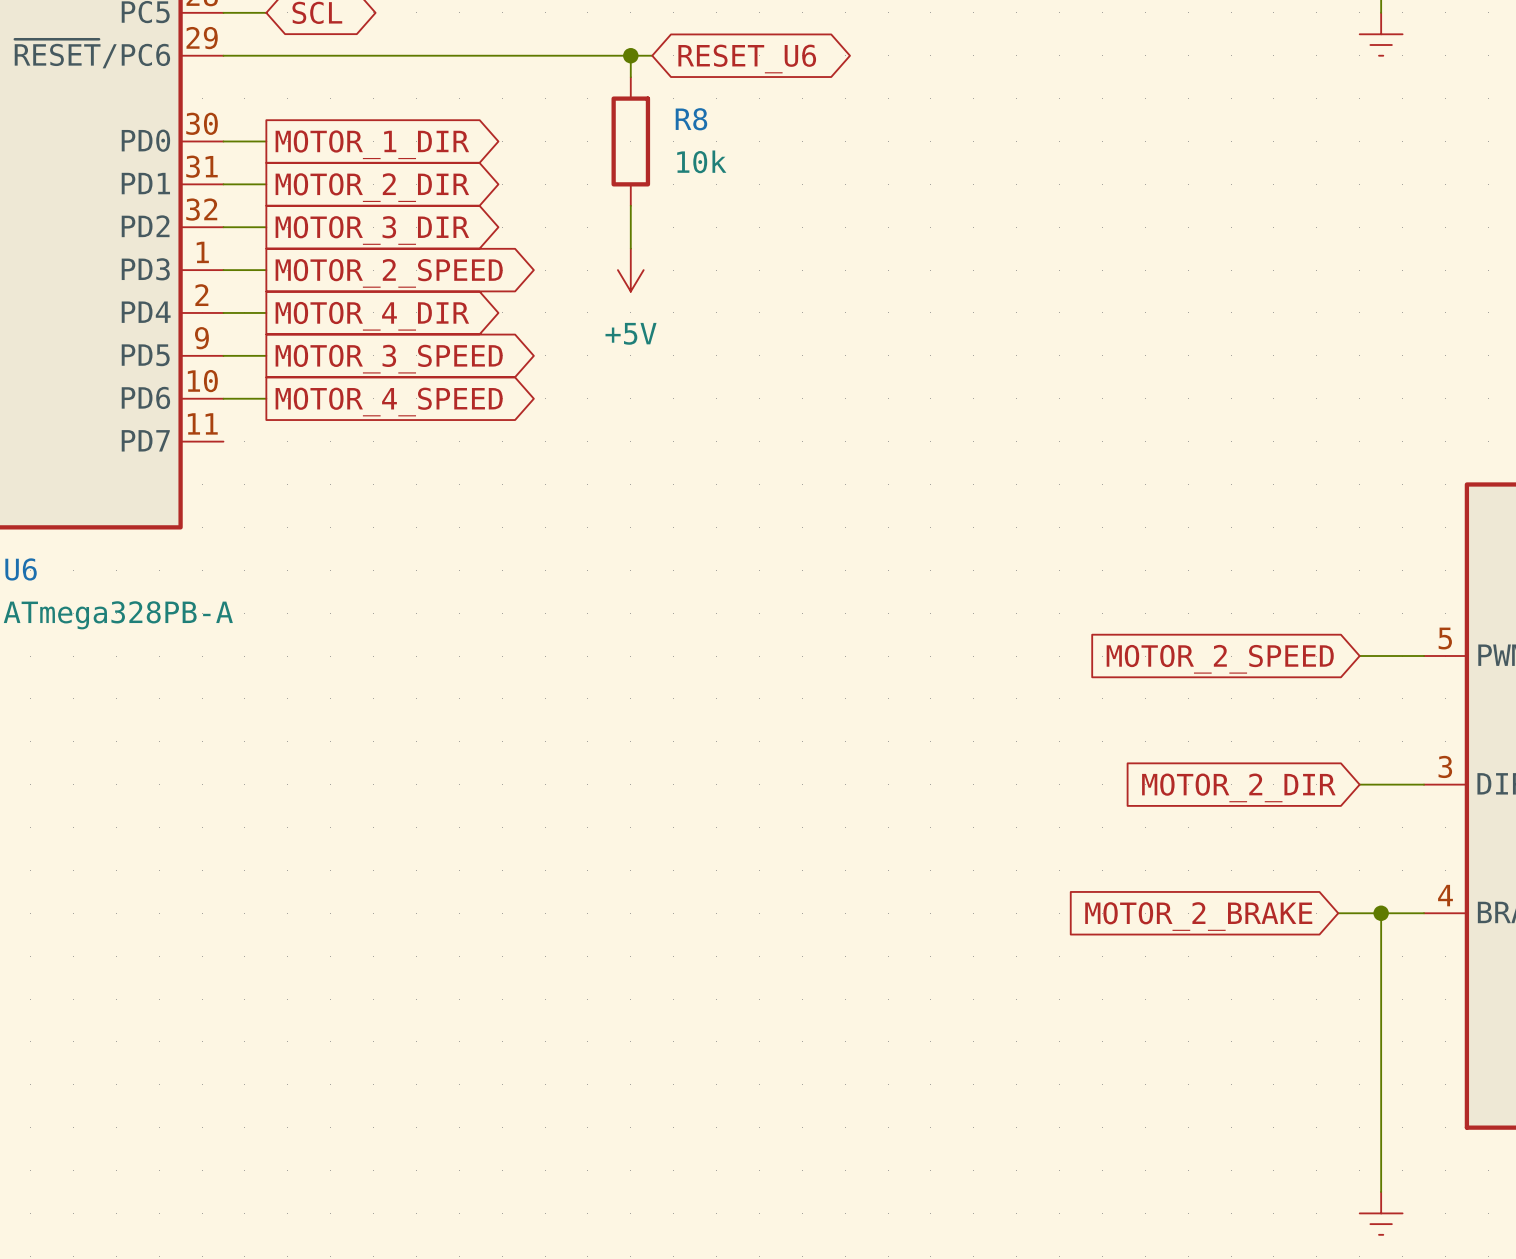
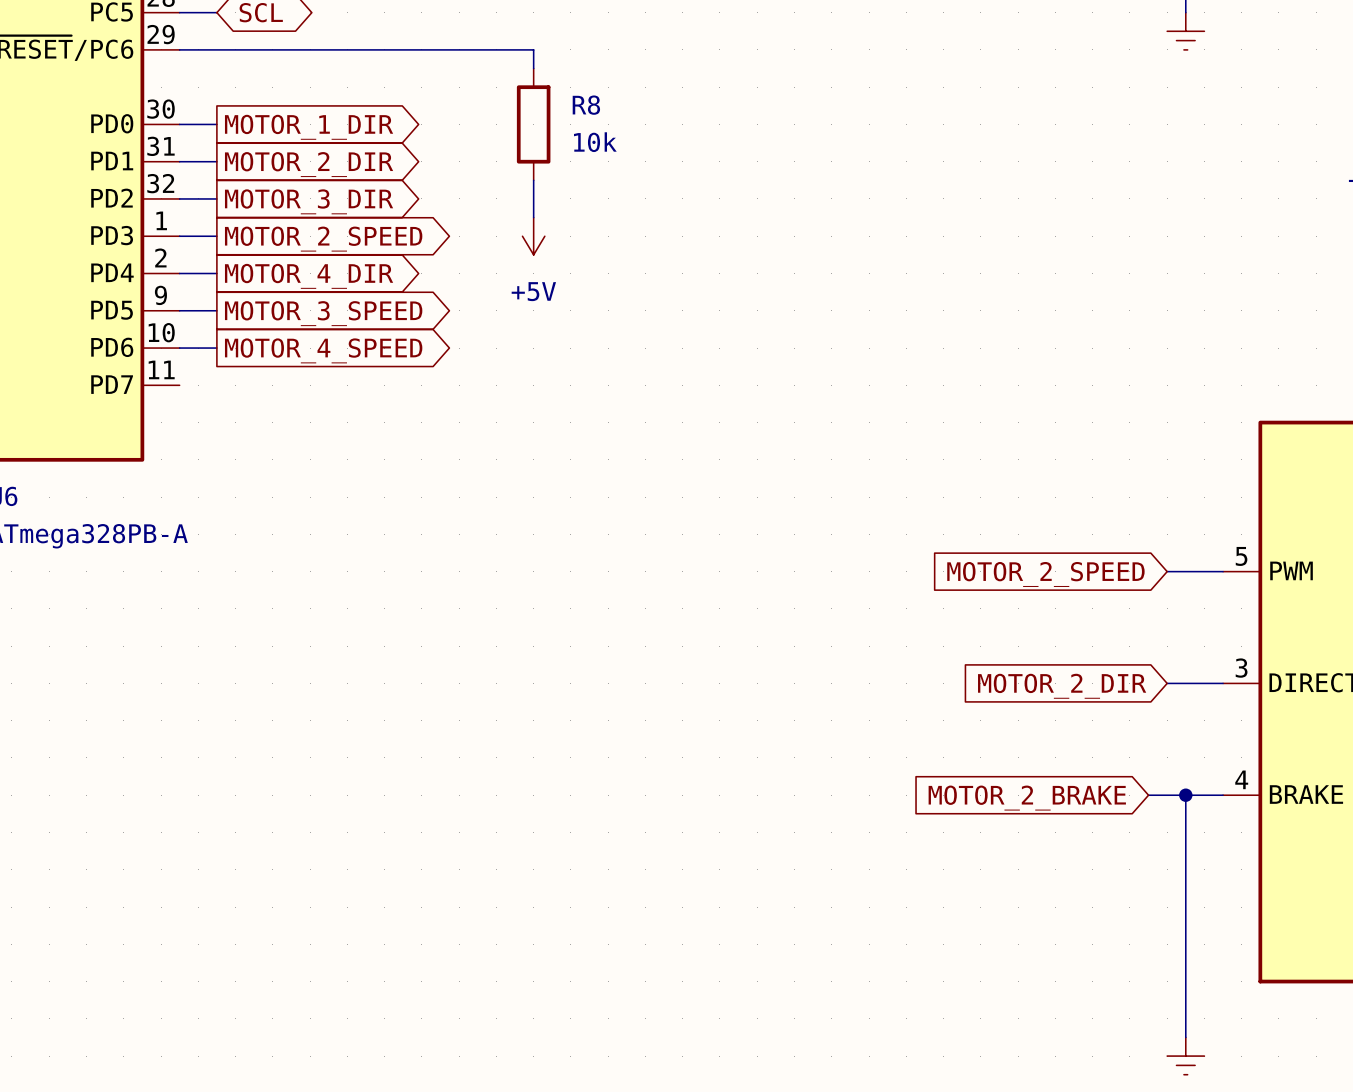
wire: (630, 55) (652, 55) -> none
junction: (630, 55) -> none
global label: RESET_U6 (747, 58) -> none

